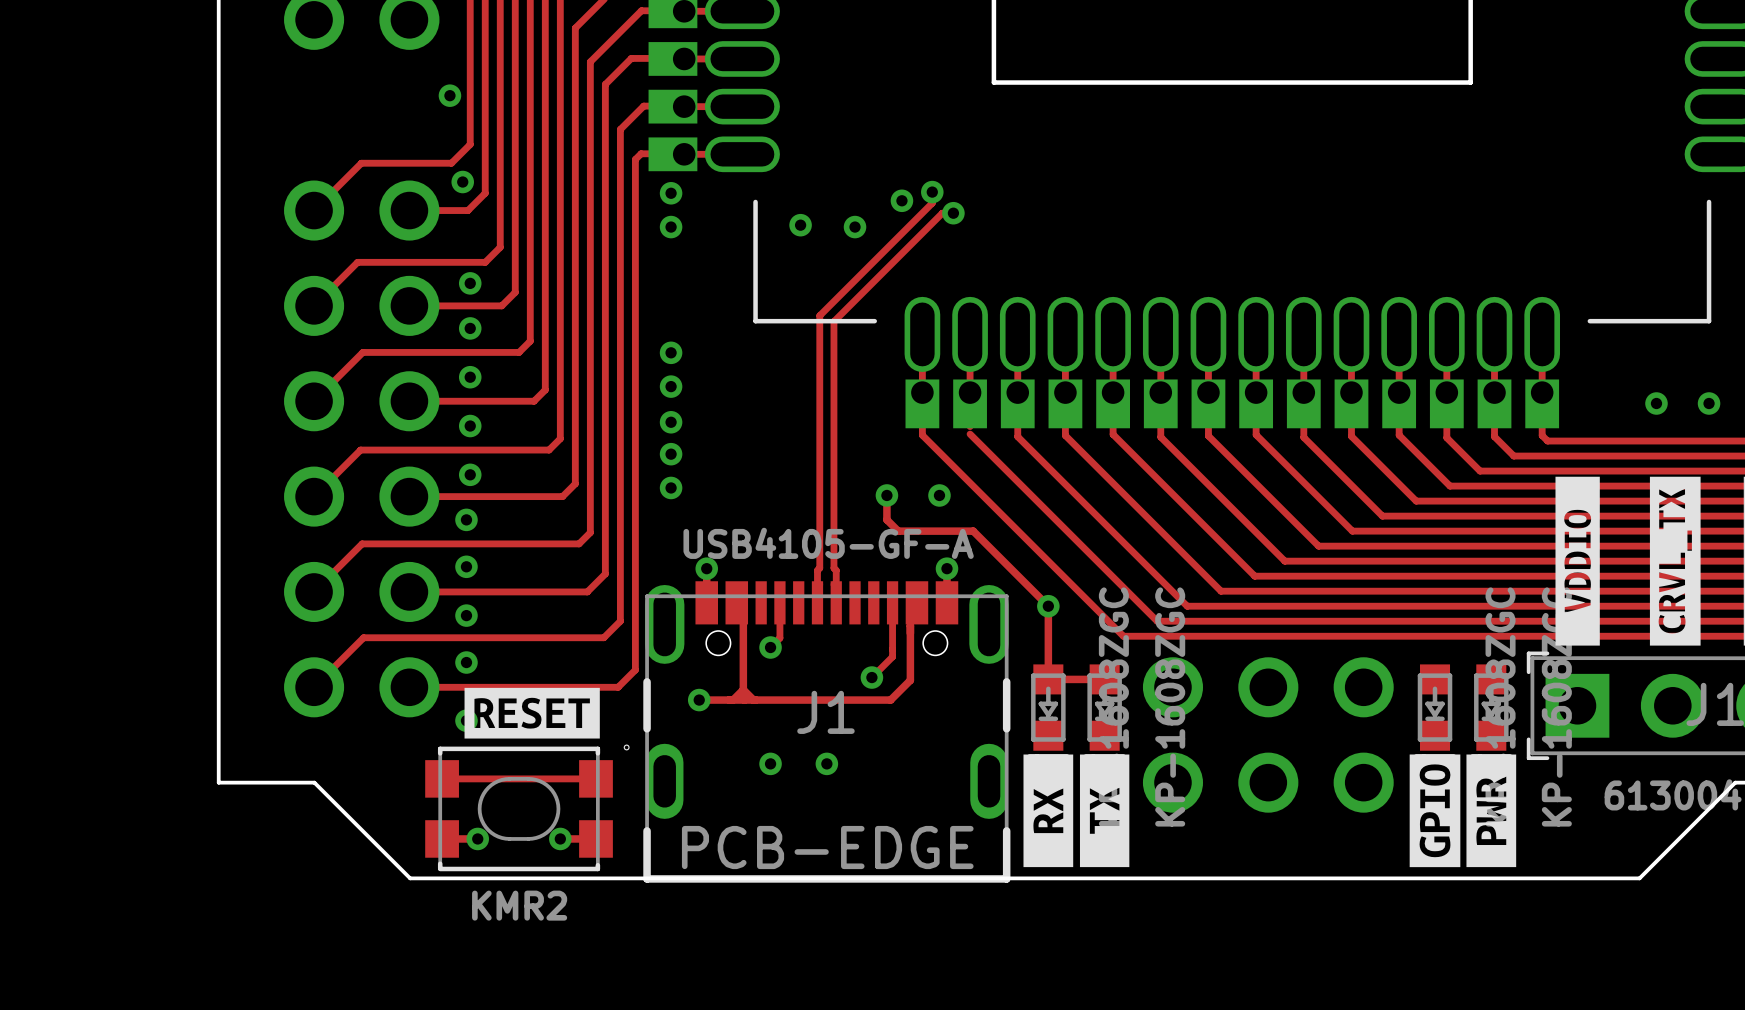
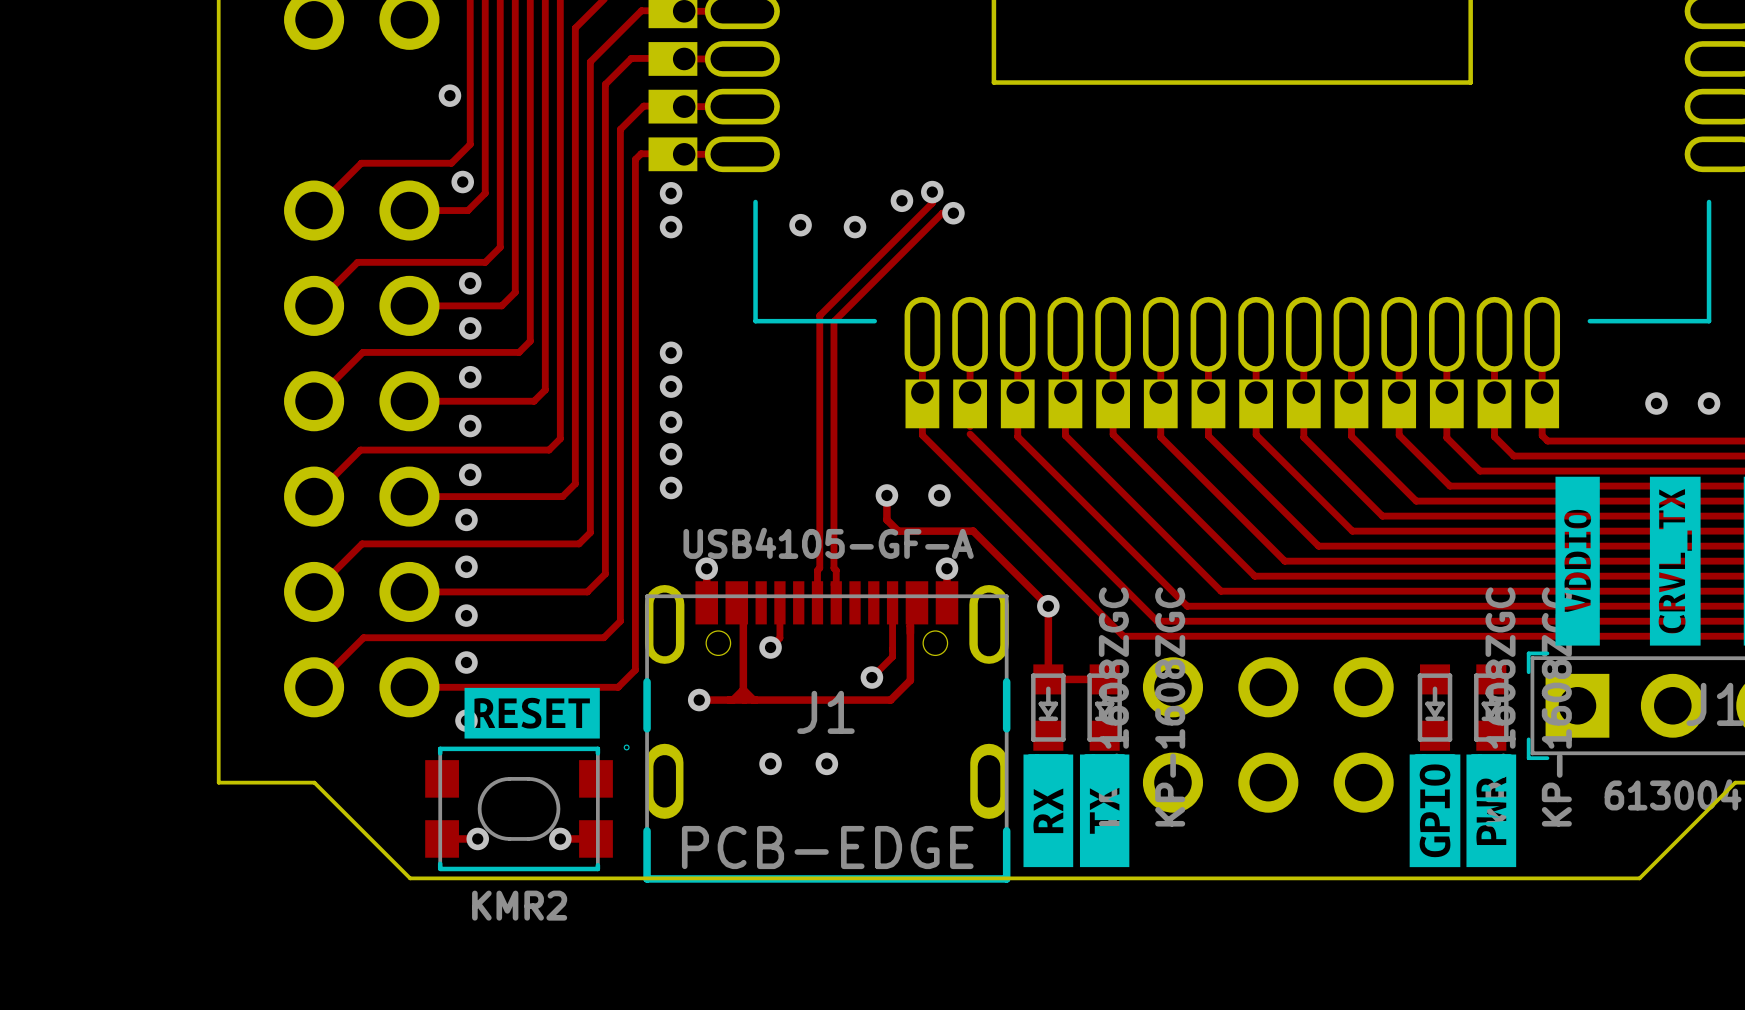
track: (442, 778) (595, 778) -> none

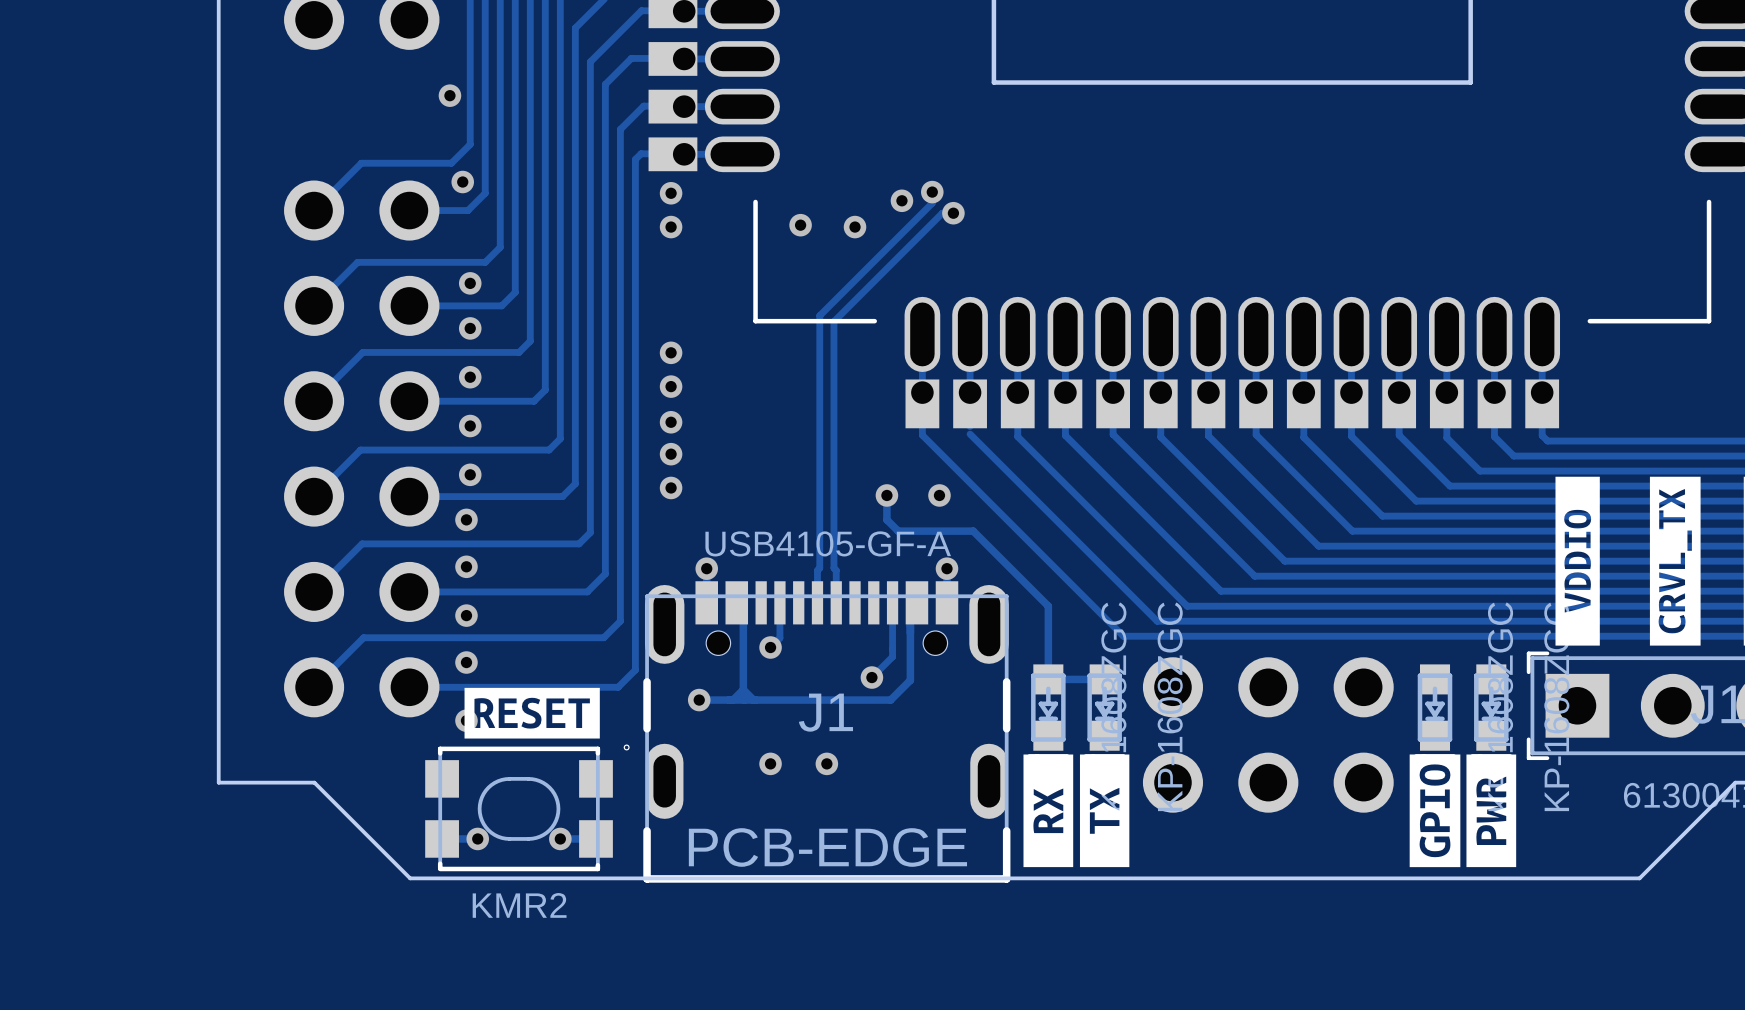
via: (1656, 403) -> none
via: (1709, 403) -> none
via: (1048, 606) -> none

